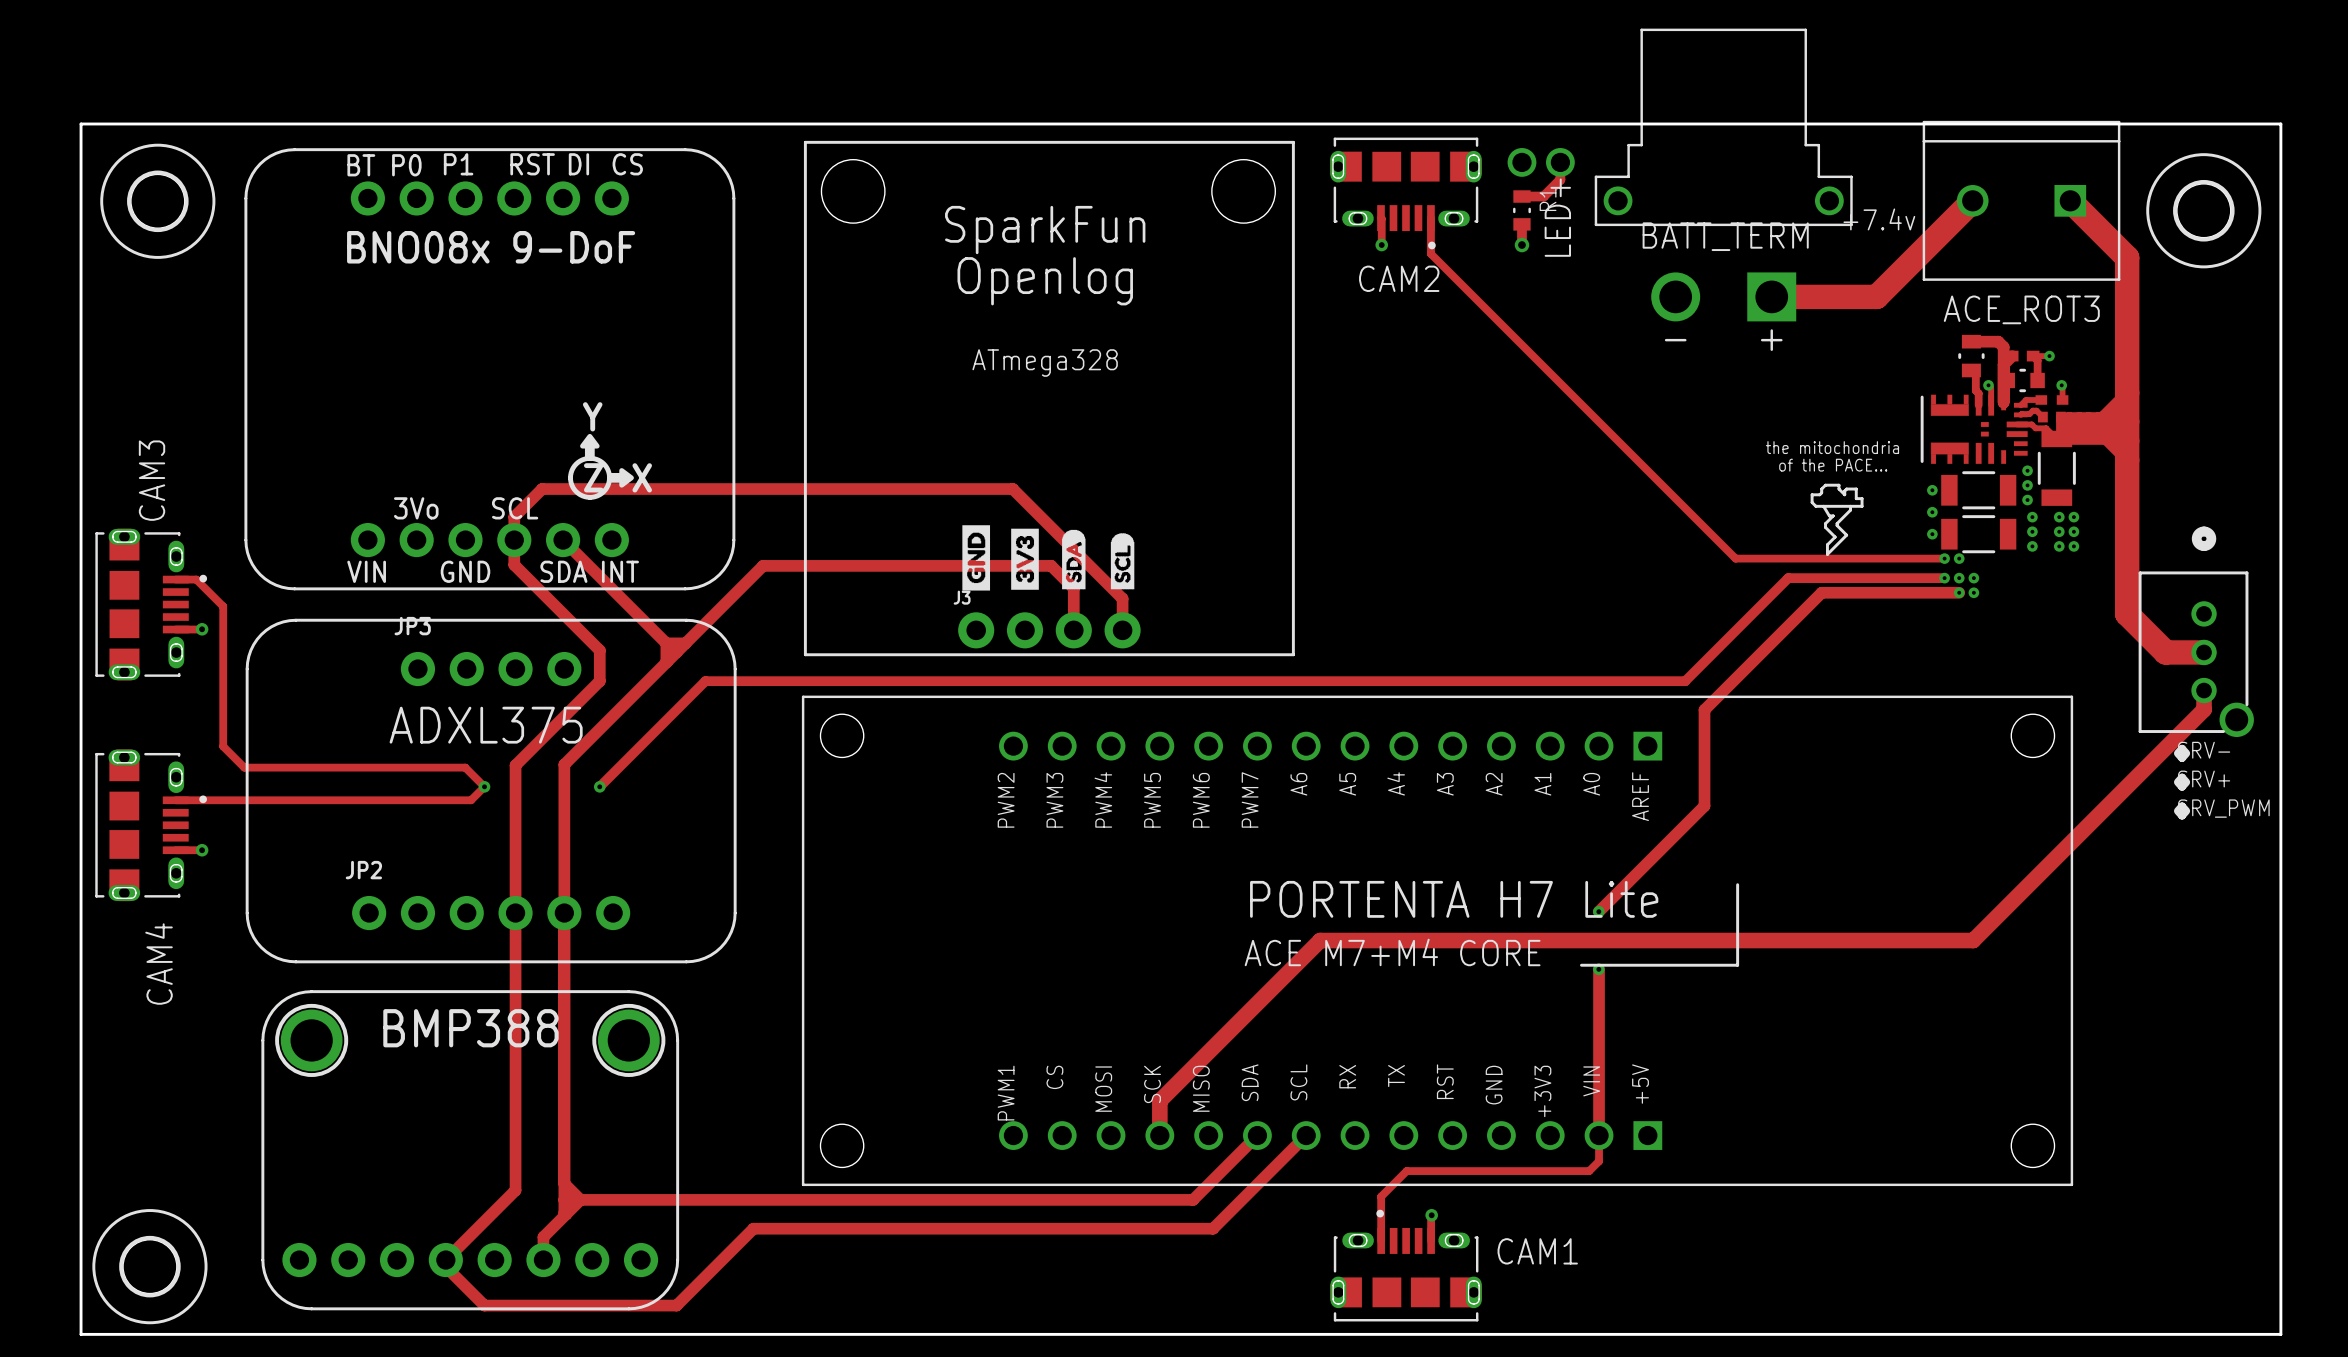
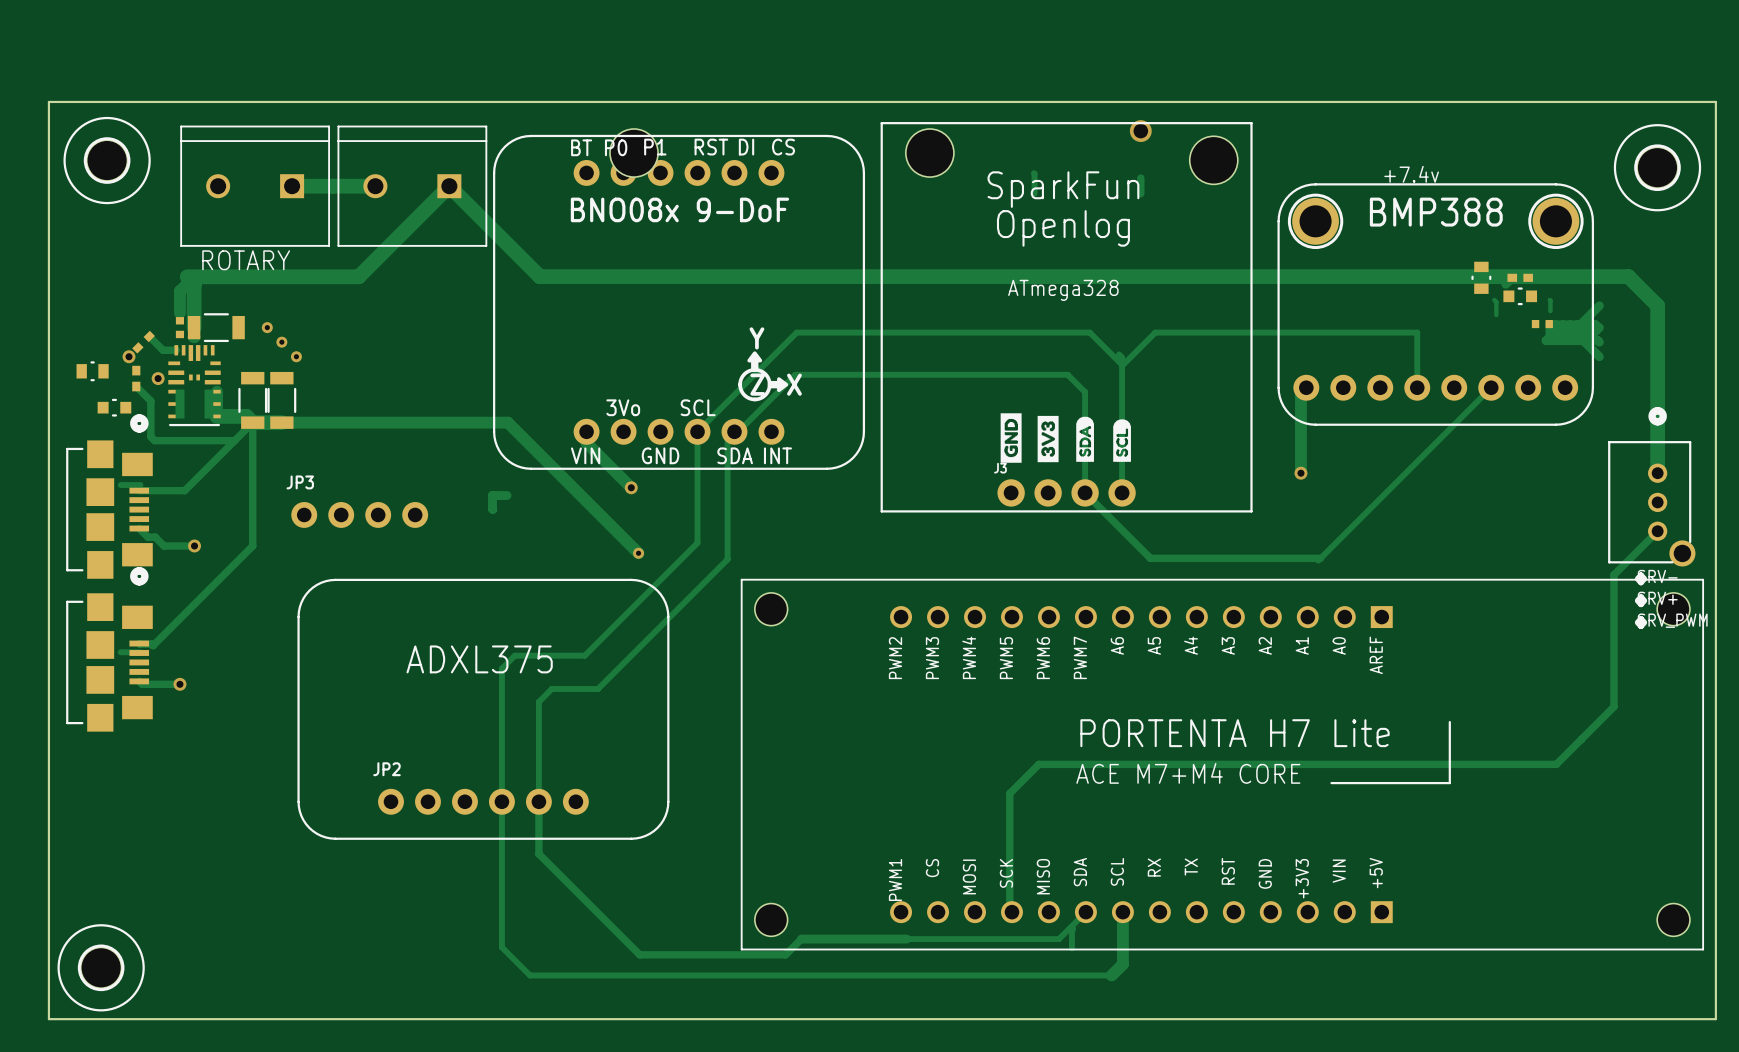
line: (805, 142) (805, 654) (1293, 654) (1293, 142) (805, 142) -> (881, 123) (881, 511) (1251, 511) (1251, 123) (881, 123)
track: (1560, 162) (1560, 179) (1543, 196) (1521, 196) -> none
via: (1560, 162) -> none
BATT_TERM: (1723, 189) -> none
CAM2: (1405, 193) -> none
track: (1972, 200) (1876, 296) (1771, 296) -> none
ACE_ROT3: (2021, 200) -> none
track: (2070, 200) (2127, 257) (2127, 613) (2165, 652) (2204, 652) -> none
part: none -> (1213, 160)
R1: (1521, 210) -> none
text: LED+ (1557, 217) -> none
track: (1430, 218) (1430, 253) (1735, 558) (1944, 558) -> none
text position: SparkFun (1045, 230) -> SparkFun (1063, 189)
line: none -> (1315, 184) (1555, 184) (1565, 185) (1578, 192) (1590, 207) (1592, 221) (1592, 387) (1591, 397) (1585, 410) (1570, 421) (1555, 424) (1315, 424) (1306, 423) (1293, 417) (1283, 406) (1278, 392) (1278, 216) (1281, 207) (1289, 195) (1301, 187) (1315, 184)
part: none -> (255, 186)
track: none -> (292, 186) (375, 186)
part: none -> (412, 186)
via: (1381, 245) -> none
via: (1521, 245) -> none
text: none -> BMP388 (1436, 212)
text position: Openlog (1045, 281) -> Openlog (1063, 228)
part: none -> (1315, 221)
part: none -> (1555, 221)
text: none -> ROTARY (246, 260)
track: (1971, 341) (1998, 341) (2003, 347) (2003, 402) (2003, 384) (2007, 380) -> none
track: (2049, 356) (2033, 356) (2037, 360) (2037, 380) -> none
via: (2049, 356) -> none
text position: ATmega328 (1045, 363) -> ATmega328 (1063, 290)
track: none -> (194, 283) (193, 336)
part position: (489, 369) -> (679, 302)
track: (1971, 370) (1975, 374) (1978, 405) -> none
via: (1988, 385) -> none
via: (2061, 385) -> none
track: (2041, 400) (2026, 400) (2020, 405) -> none
part: (2051, 400) -> none
track: none -> (179, 313) (179, 291) (187, 283) (187, 276) (358, 276) (449, 186) (539, 276) (1628, 276) (1657, 305) (1657, 473)
track: (2020, 414) (2036, 410) (2042, 417) -> none
part: none -> (179, 327)
part: none -> (216, 327)
via: none -> (267, 327)
track: (2017, 424) (2031, 424) (2035, 428) (2046, 428) (2056, 438) -> none
part: (1974, 429) -> none
track: none -> (149, 336) (163, 350) (175, 349)
part: none -> (143, 342)
via: none -> (281, 342)
text: the mitochondria (1832, 447) -> none
track: none -> (1118, 354) (1122, 357) (1122, 492)
via: none -> (129, 356)
via: none -> (296, 356)
text: of the PACE... (1833, 465) -> none
part: (2056, 468) -> none
track: none -> (1122, 364) (1089, 332) (796, 332) (697, 431) (697, 542) (584, 655) (514, 655) (501, 668) (501, 947) (530, 975) (1111, 975) (1122, 964) (1122, 912)
via: (2027, 470) -> none
track: none -> (1122, 365) (1155, 332) (1417, 332) (1417, 387)
part: none -> (92, 371)
line: (1825, 485) (1838, 485) (1838, 489) (1844, 494) (1846, 489) (1856, 489) (1856, 498) (1862, 498) (1862, 506) (1815, 506) (1812, 502) (1812, 494) (1819, 494) (1825, 485) -> none
via: (2027, 485) -> none
part: none -> (136, 378)
via: none -> (158, 378)
via: (1932, 490) -> none
part: (1978, 490) -> none
part: none -> (194, 385)
track: none -> (136, 386) (150, 401) (150, 436) (154, 440) (234, 440)
via: (2027, 500) -> none
track: none -> (1306, 387) (1300, 393) (1300, 473)
part: none -> (1435, 387)
track: none -> (1491, 387) (1318, 560)
track: none -> (217, 391) (217, 416) (246, 416) (252, 422)
line: (1823, 506) (1829, 515) (1833, 515) (1825, 523) (1825, 527) (1835, 537) (1827, 544) (1827, 554) (1846, 535) (1837, 523) (1850, 510) (1850, 506) -> none
via: (1932, 512) -> none
part: none -> (252, 400)
part: none -> (281, 400)
via: (2032, 517) -> none
via: (2059, 517) -> none
via: (2073, 517) -> none
part: none -> (114, 407)
via: (2032, 531) -> none
via: (2059, 531) -> none
via: (2073, 531) -> none
via: (1932, 534) -> none
part: (1978, 534) -> none
track: (563, 540) (676, 652) -> none
via: (2032, 546) -> none
via: (2059, 546) -> none
via: (2073, 546) -> none
track: none -> (252, 422) (184, 490) (139, 490)
track: none -> (252, 422) (252, 545) (153, 645) (139, 643)
track: none -> (252, 422) (507, 422) (638, 553)
drawing position: (976, 557) -> (1011, 438)
via: (1944, 558) -> none
via: (1959, 558) -> none
track: none -> (586, 431) (586, 443) (631, 487)
drawing position: (1024, 559) -> (1048, 439)
drawing position: (1073, 559) -> (1085, 439)
drawing position: (1122, 561) -> (1122, 440)
track: (1944, 578) (1788, 578) (1685, 681) (705, 681) (599, 786) -> none
via: (1944, 578) -> none
via: (1959, 578) -> none
via: (1973, 578) -> none
track: (175, 579) (196, 579) (223, 606) (223, 746) (244, 767) (465, 767) (484, 786) (471, 800) (175, 800) -> none
track: (1959, 592) (1821, 592) (1704, 709) (1704, 806) (1598, 911) -> none
via: (1959, 592) -> none
via: (1973, 592) -> none
CAM3: (151, 604) -> none
via: none -> (1300, 473)
line: (295, 620) (686, 620) (698, 621) (716, 630) (725, 639) (731, 650) (735, 669) (735, 913) (733, 925) (725, 942) (716, 951) (705, 958) (686, 961) (295, 961) (283, 960) (266, 951) (257, 942) (250, 931) (247, 913) (247, 662) (250, 650) (261, 634) (277, 623) (295, 620) -> (335, 579) (631, 579) (640, 581) (653, 587) (665, 602) (668, 616) (668, 801) (667, 811) (660, 824) (645, 835) (631, 838) (335, 838) (325, 837) (313, 831) (301, 815) (298, 801) (298, 612) (301, 602) (309, 590) (321, 582) (335, 579)
via: (202, 629) -> none
J3 position: (1049, 630) -> (1066, 492)
track: (1073, 630) (1073, 588) (1051, 565) (763, 565) (564, 764) (564, 1212) (566, 1214) -> none
track: (1122, 630) (1122, 598) (1012, 489) (542, 489) (514, 516) (514, 564) (599, 650) (599, 681) (515, 765) (515, 1190) (445, 1260) (445, 1266) (484, 1305) (676, 1305) (753, 1228) (1074, 1228) -> (1320, 558) (1150, 558) (1085, 492) (1085, 392) (1067, 374) (795, 374) (738, 431) (734, 431) (727, 438) (727, 559) (598, 688) (551, 688) (538, 701) (538, 853) (639, 954) (785, 954) (801, 939)
via: none -> (631, 487)
part: none -> (109, 496)
track: none -> (139, 528) (147, 537) (155, 537) (164, 545) (194, 545)
track: (2204, 690) (2204, 709) (1973, 940) (1320, 940) (1159, 1100) (1159, 1135) -> (1657, 531) (1613, 574) (1613, 706) (1556, 764) (1038, 764) (1009, 793) (1009, 909) (1011, 912)
via: none -> (194, 545)
via: none -> (638, 553)
text position: ADXL375 (486, 725) -> ADXL375 (479, 659)
via: (484, 786) -> none
via: (599, 786) -> none
CAM4: (151, 825) -> none
part: none -> (109, 649)
via: (202, 850) -> none
track: none -> (139, 681) (142, 684) (179, 684)
via: none -> (179, 684)
via: (1598, 911) -> none
JP2 position: (491, 913) -> (483, 801)
part position: (1437, 940) -> (1222, 764)
via: (1598, 969) -> none
track: (1599, 969) (1599, 1161) (1589, 1171) (1406, 1171) (1381, 1196) (1381, 1240) -> none
line: (311, 991) (628, 991) (641, 993) (658, 1001) (667, 1010) (673, 1021) (677, 1040) (677, 1260) (675, 1272) (667, 1289) (658, 1298) (647, 1305) (628, 1308) (311, 1308) (299, 1307) (281, 1298) (269, 1284) (263, 1266) (263, 1034) (266, 1021) (277, 1005) (292, 995) (311, 991) -> none
text: BMP388 (470, 1028) -> none
part: (311, 1040) -> none
part: (628, 1040) -> none
track: (1257, 1135) (1193, 1199) (564, 1199) -> none
track: (1306, 1135) (1213, 1228) -> (1085, 912) (1059, 939) (906, 939)
track: (564, 1183) (580, 1199) (543, 1237) (543, 1260) -> none
via: (1431, 1215) -> none
part: (470, 1260) -> none
CAM1: (1406, 1265) -> none

